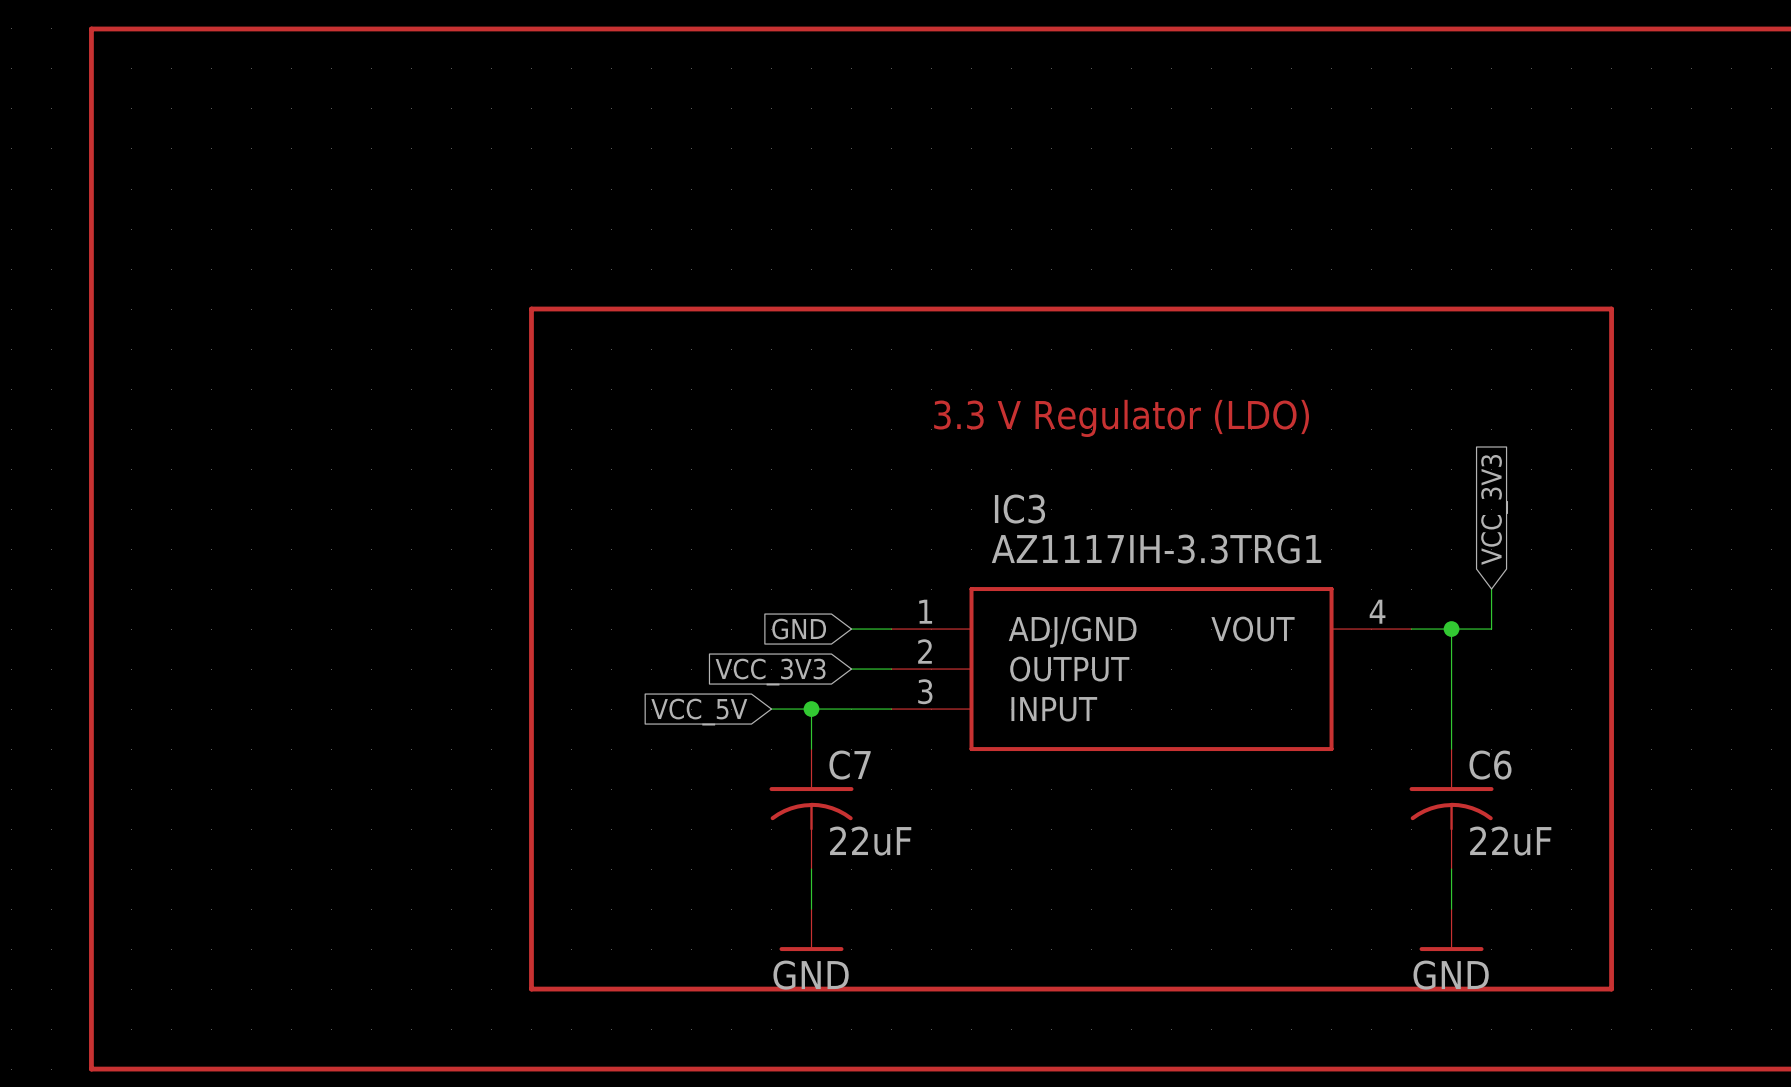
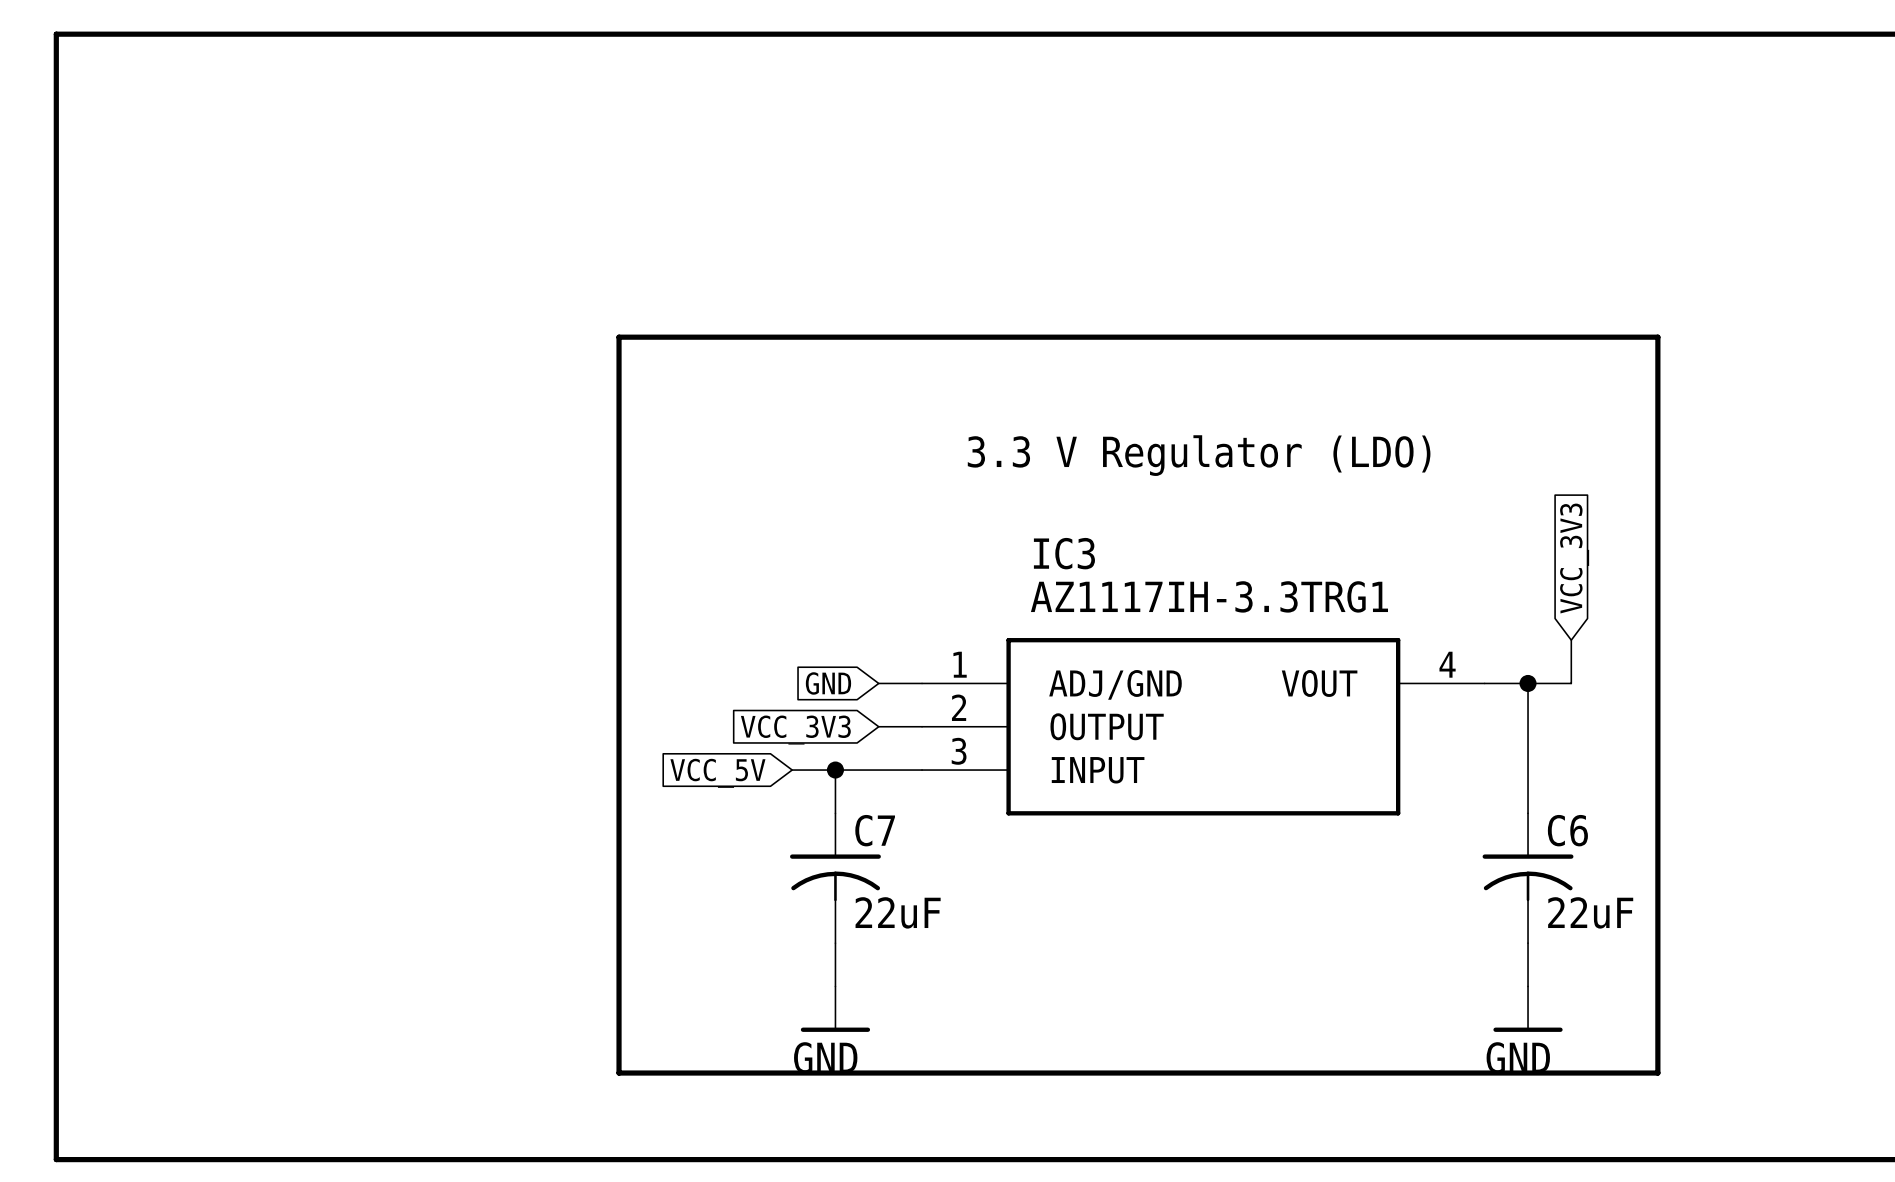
line: (611, 309) (531, 309) (531, 989) (611, 989) -> (619, 337) (619, 1073)
line: (1571, 309) (1611, 309) (1611, 989) (1571, 989) -> (1657, 337) (1657, 1073)

